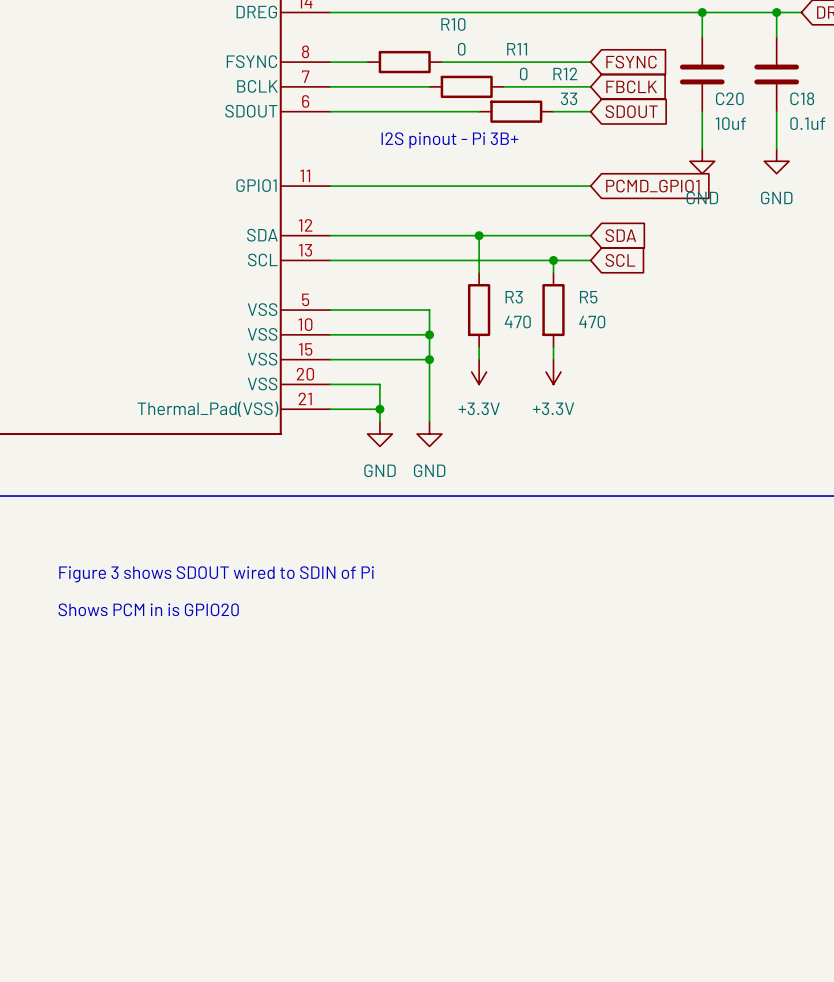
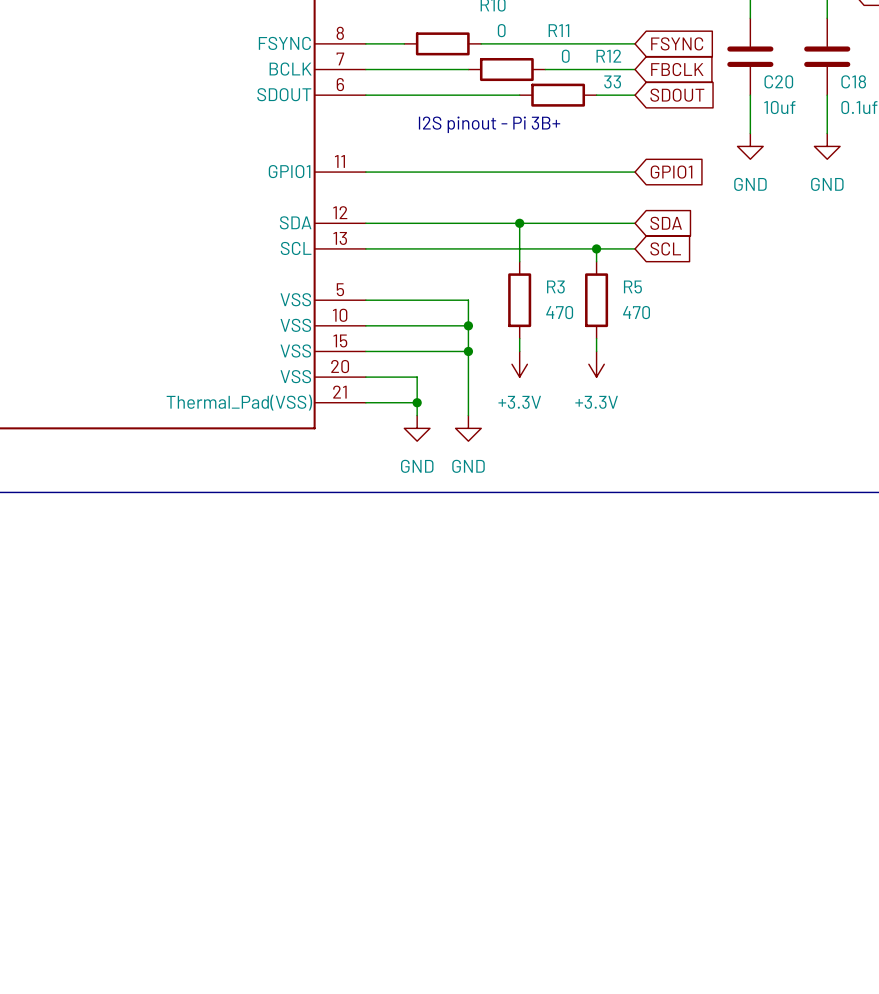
global label: PCMD_GPIO1 (652, 186) -> GPIO1 (671, 172)
text: Figure 3 shows SDOUT wired to SDIN of Pi (216, 574) -> none
text: Shows PCM in is GPIO20 (148, 609) -> none

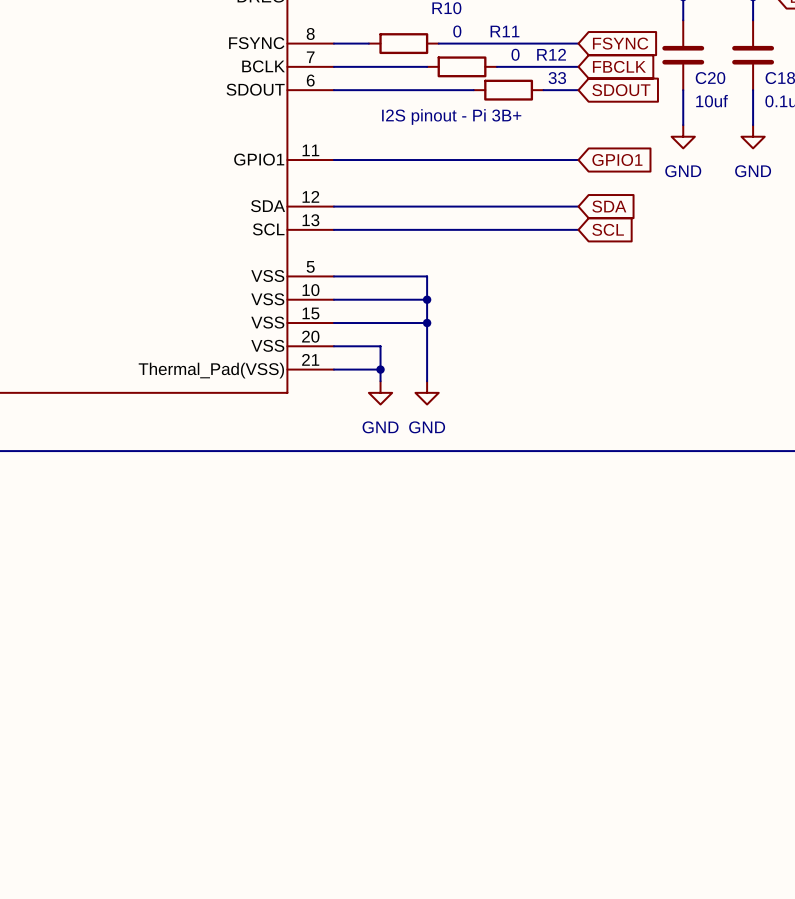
wire: (519, 223) (519, 261) -> none
junction: (519, 223) -> none
wire: (596, 248) (596, 261) -> none
junction: (596, 248) -> none
R3: 470 (519, 300) -> none
R5: 470 (596, 300) -> none
wire: (519, 338) (519, 351) -> none
wire: (596, 338) (596, 351) -> none
power symbol: +3.3V (519, 364) -> none
power symbol: +3.3V (596, 364) -> none

